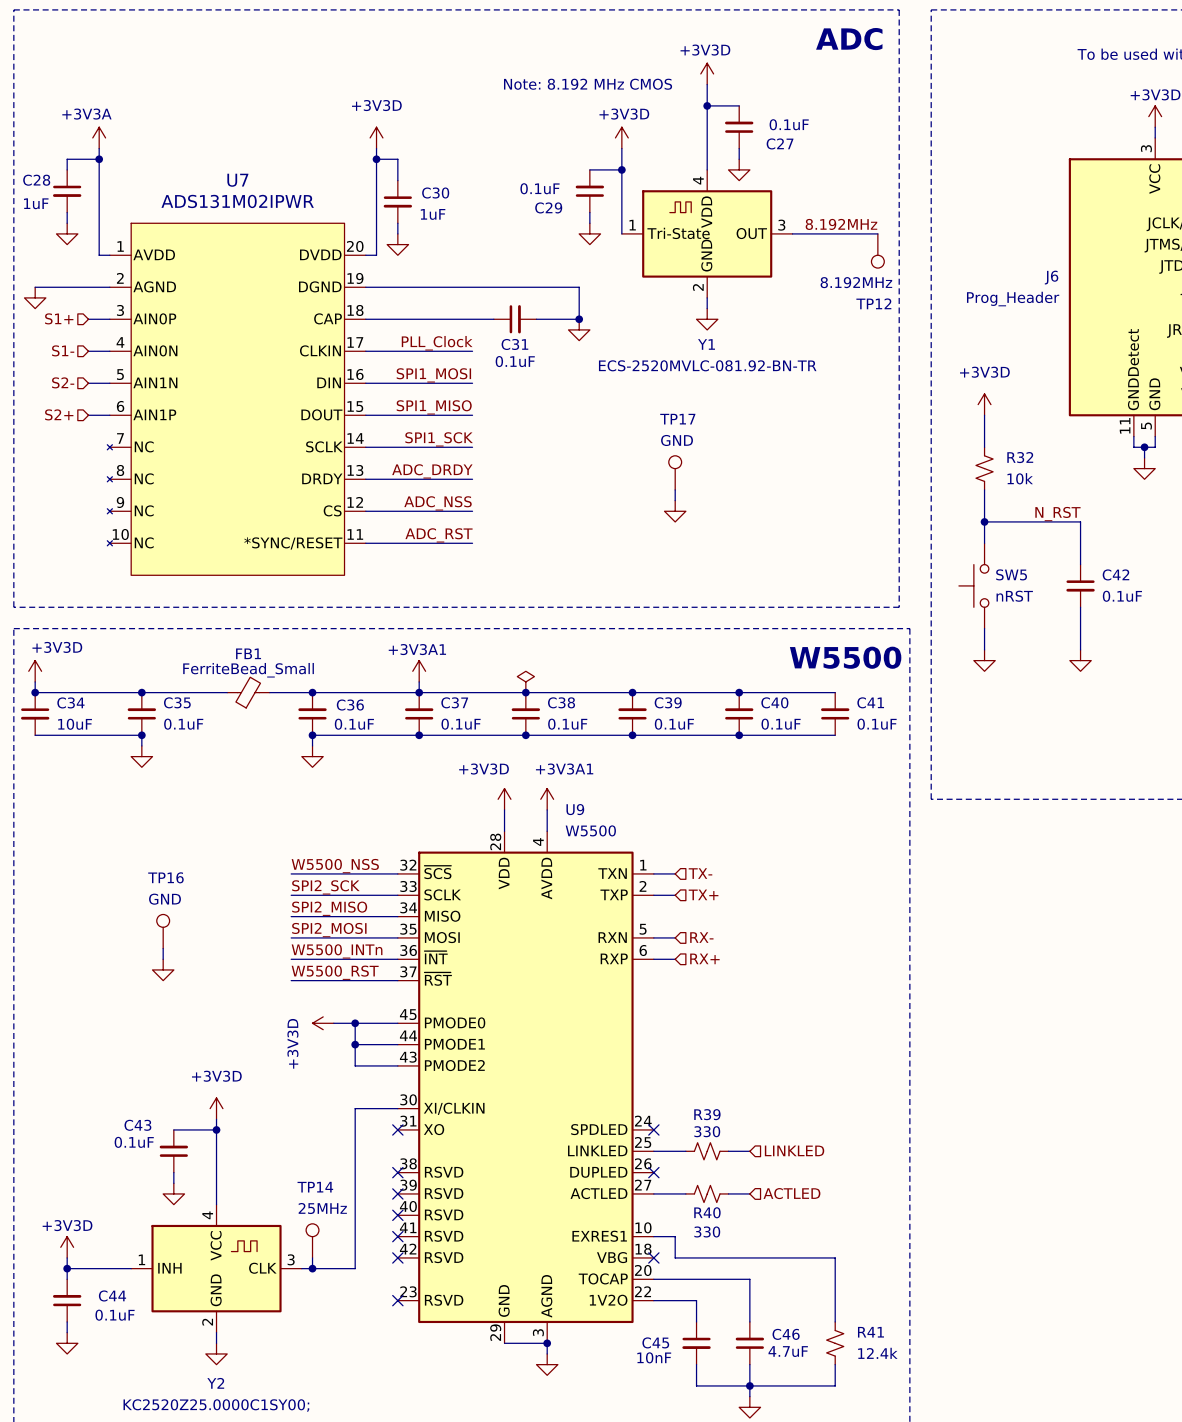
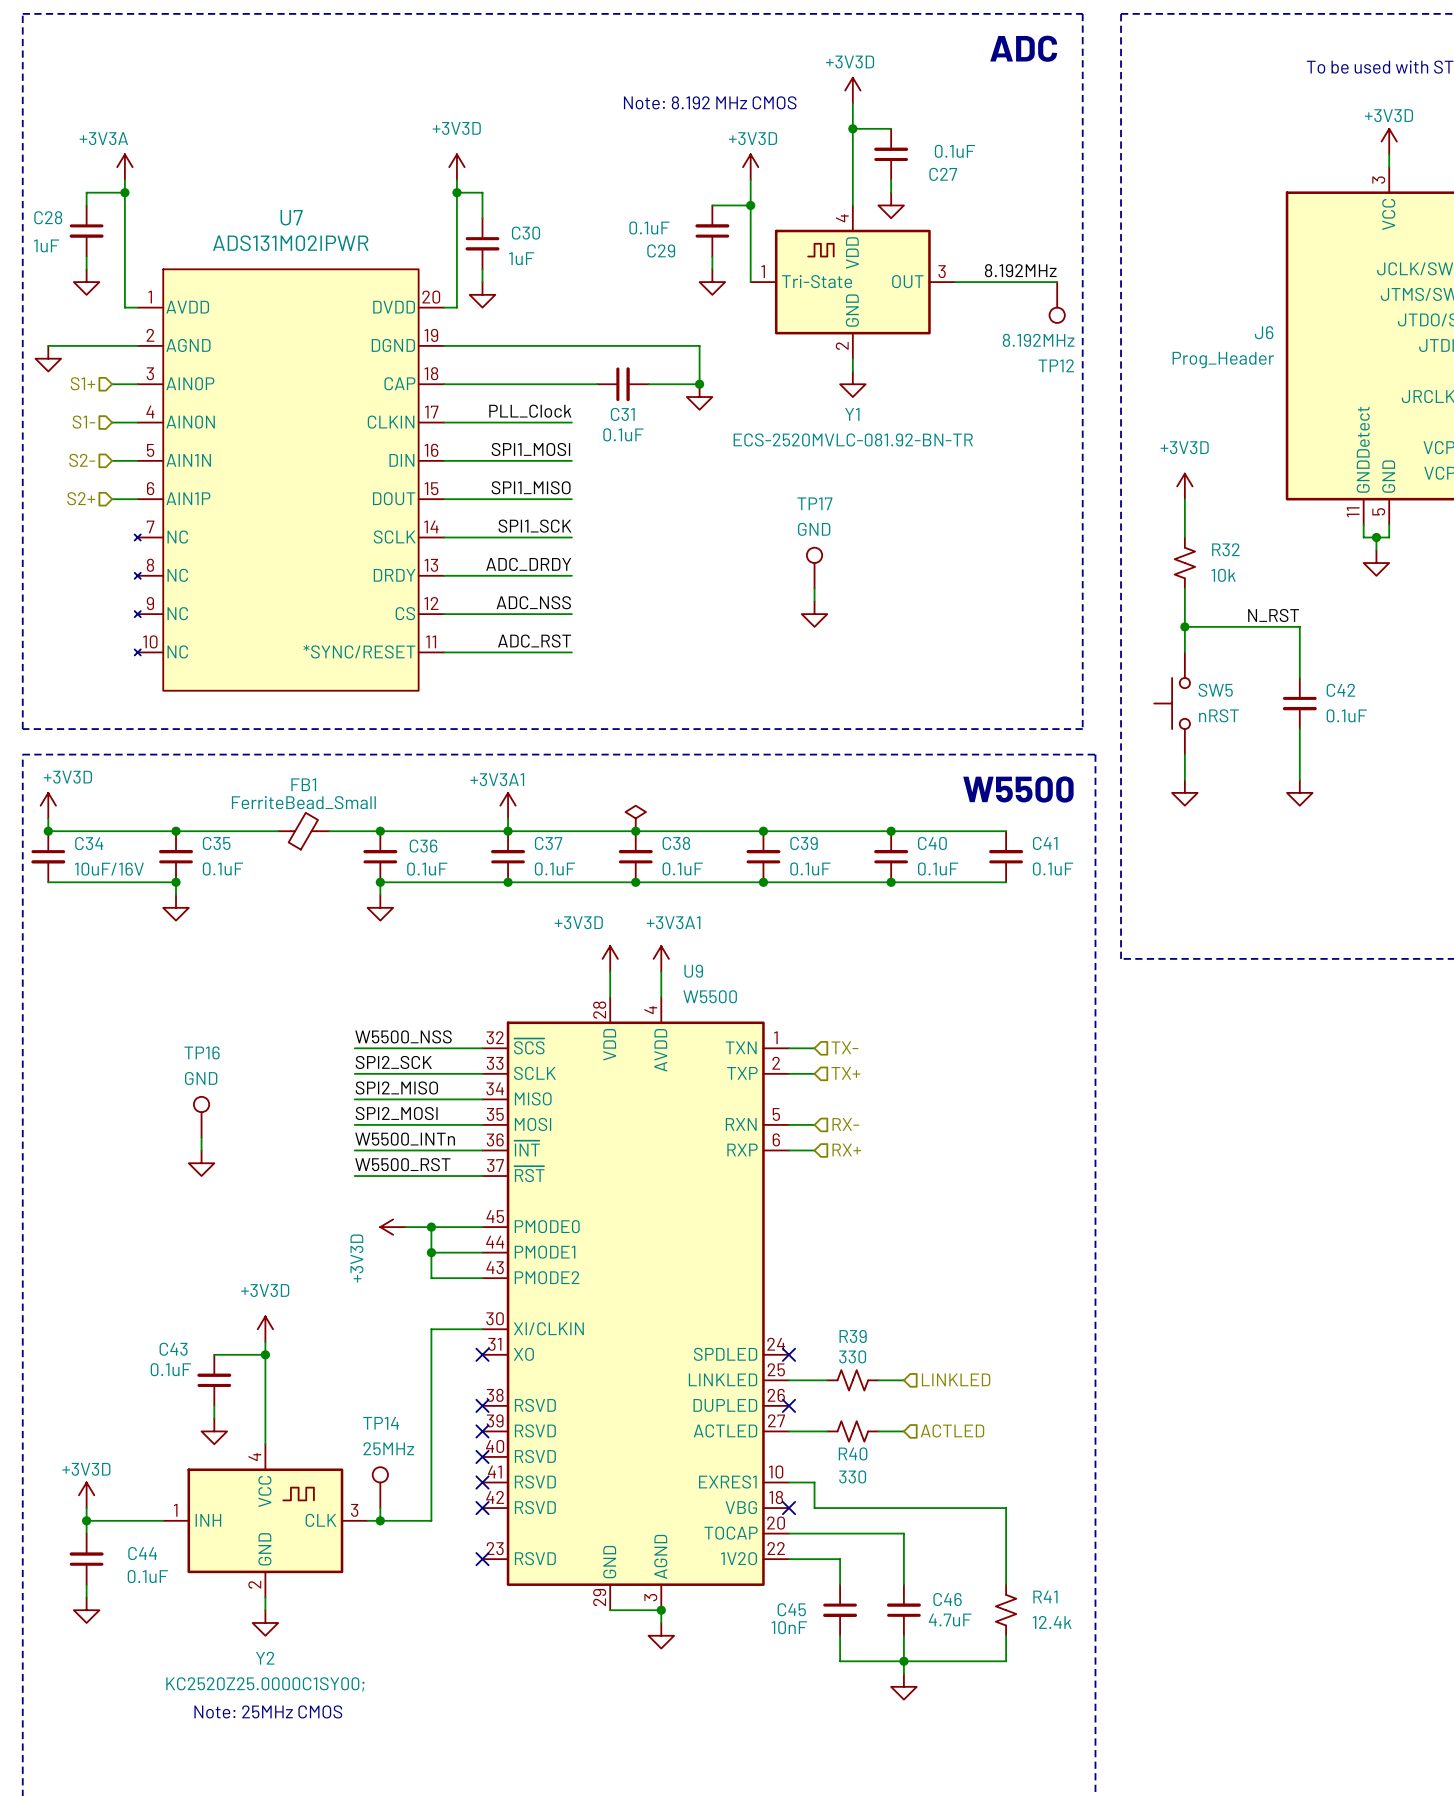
C34 value: 10uF (75, 724) -> 10uF/16V (109, 869)

